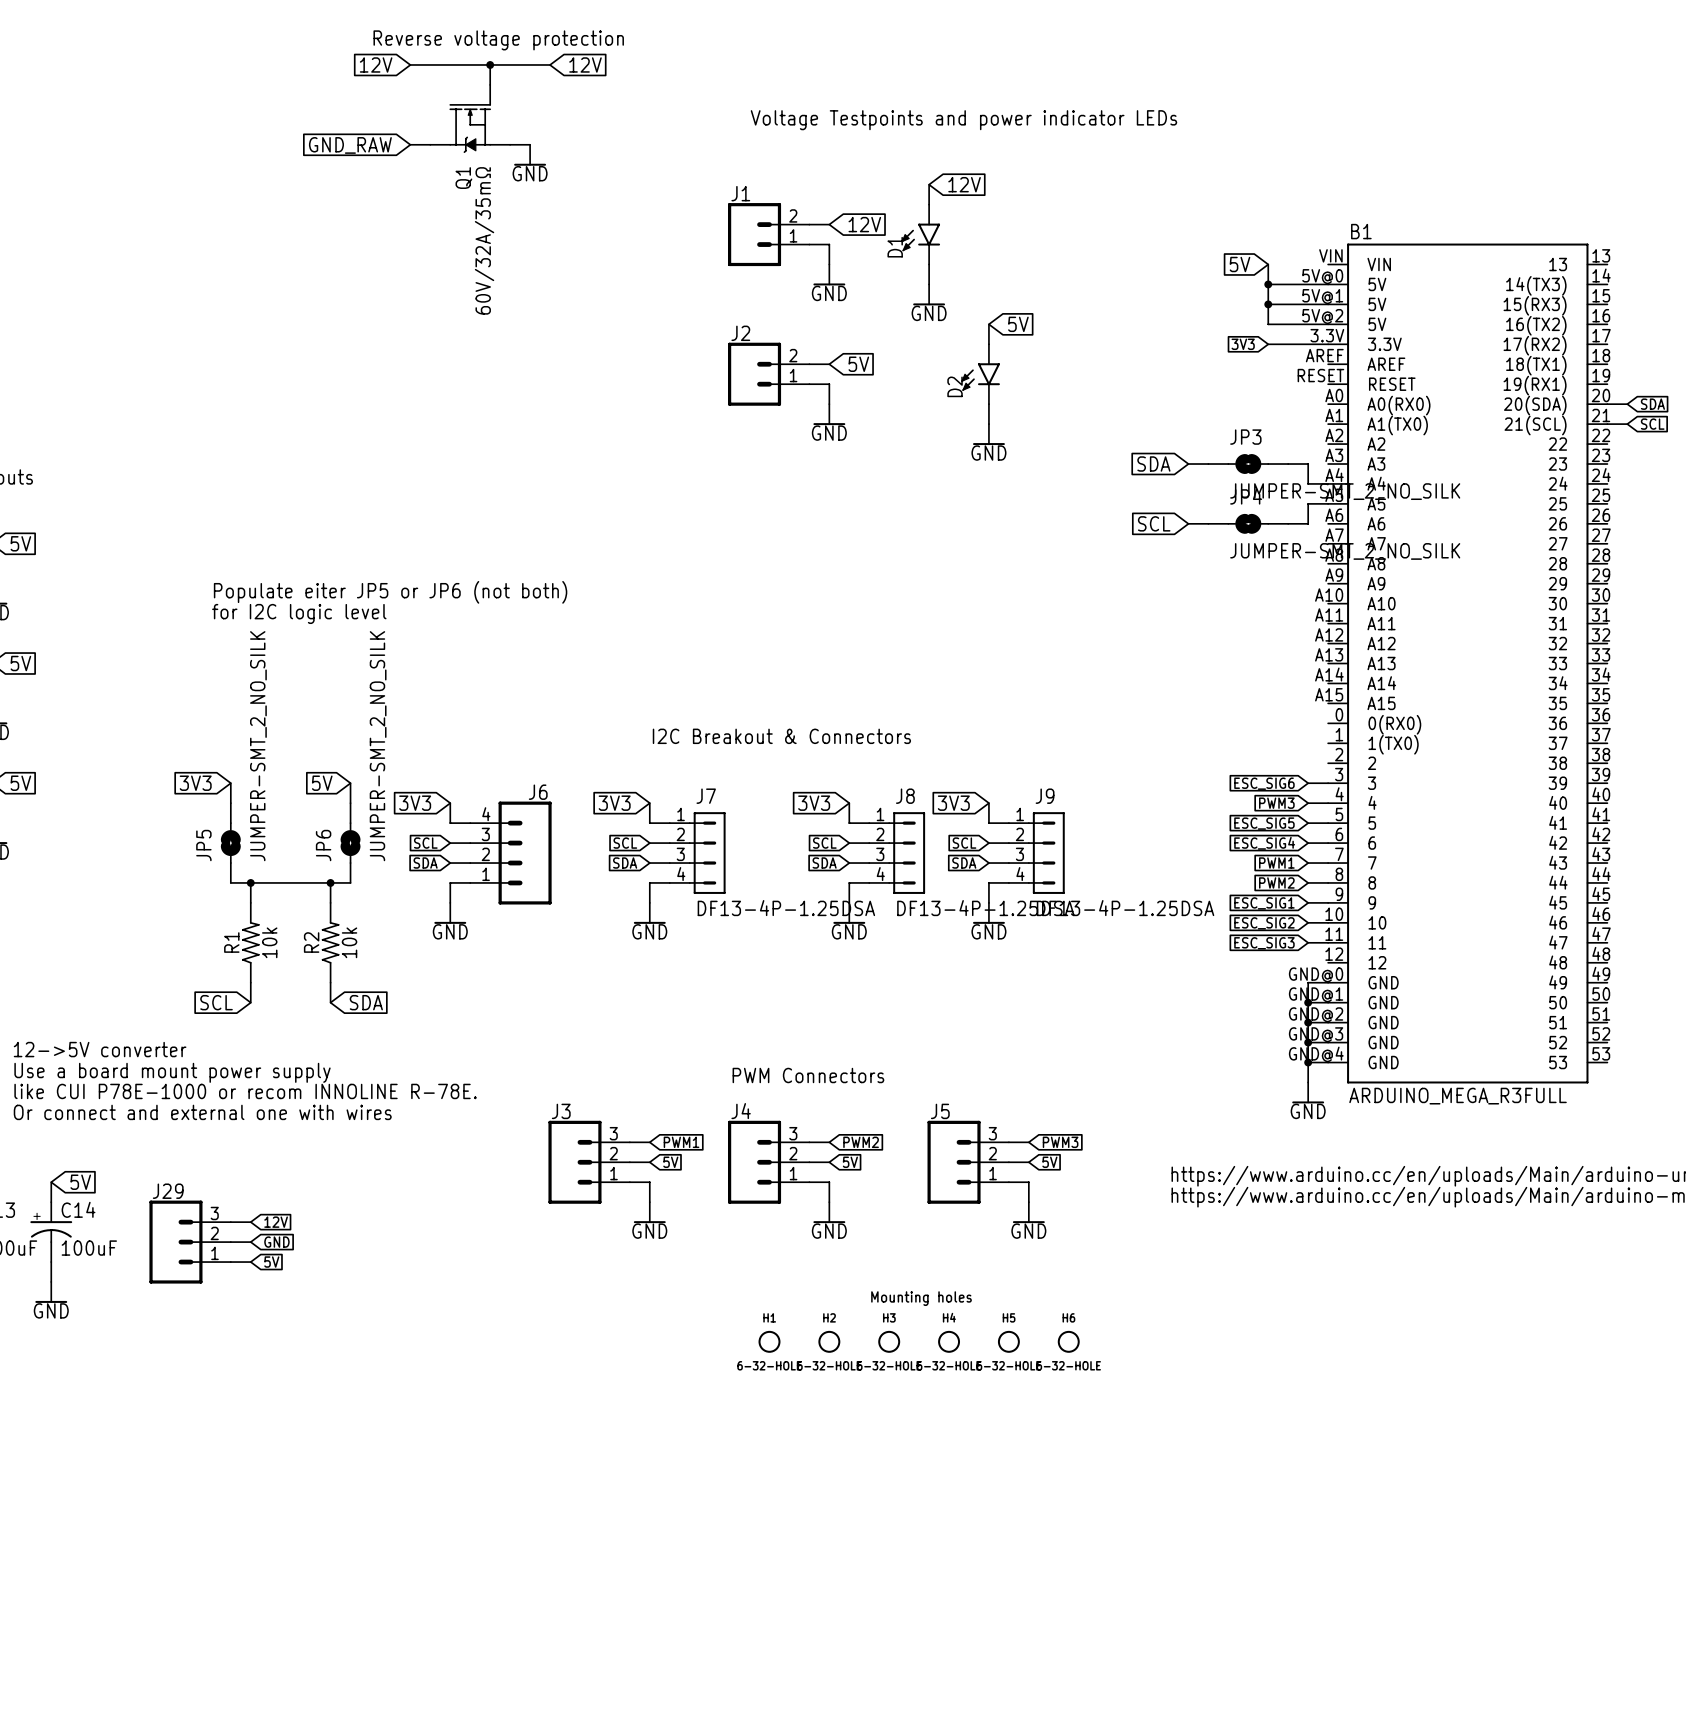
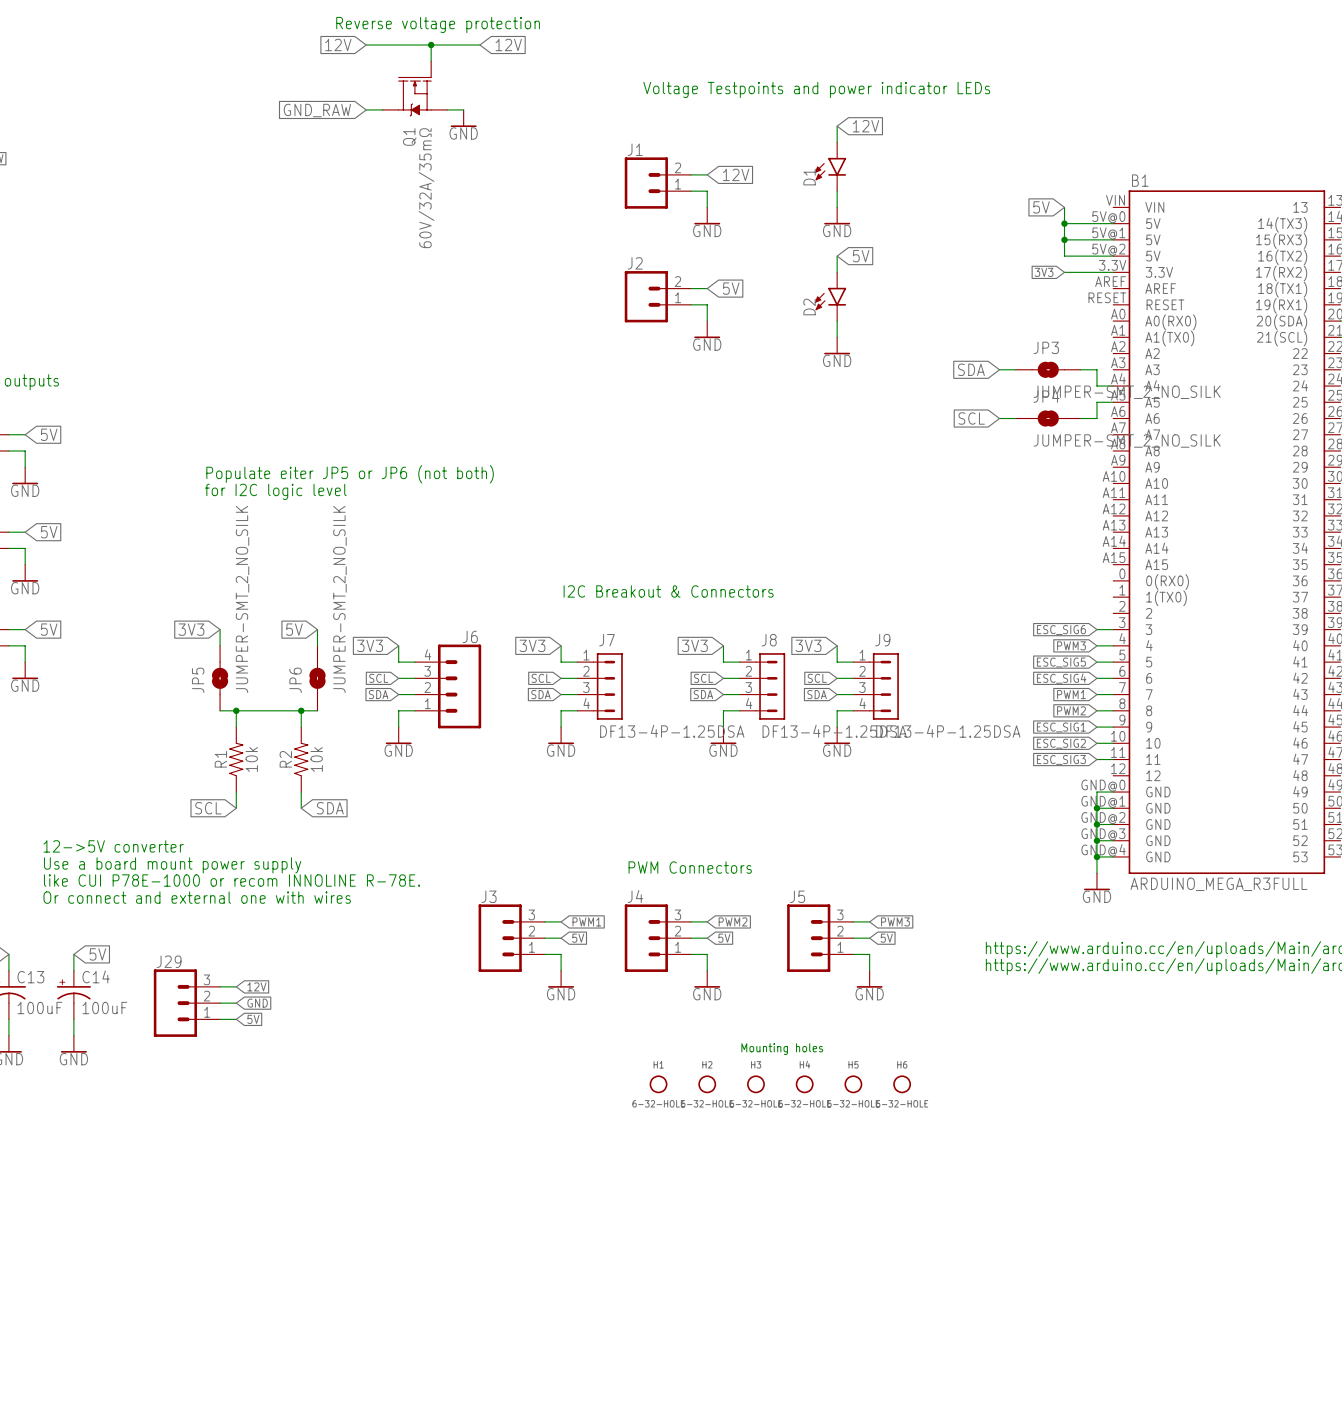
wire: (929, 184) (929, 204) -> (837, 126) (837, 142)
global label position: 12V (964, 184) -> 12V (866, 126)
D1 position: (920, 234) -> (830, 166)
wire: (929, 264) (929, 284) -> (837, 191) (837, 207)
power symbol position: GND (929, 294) -> GND (837, 215)

